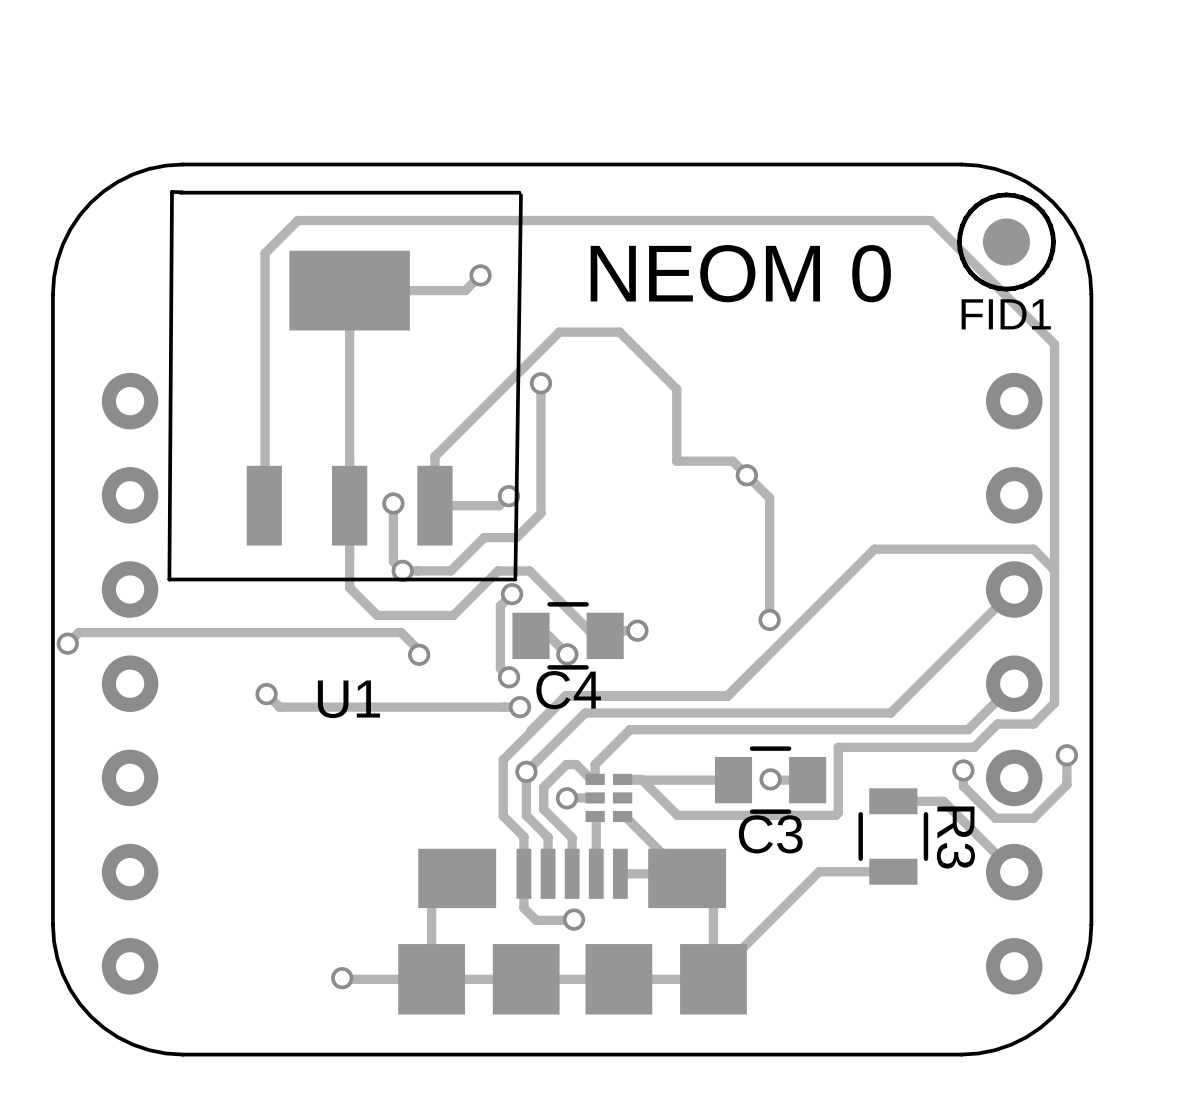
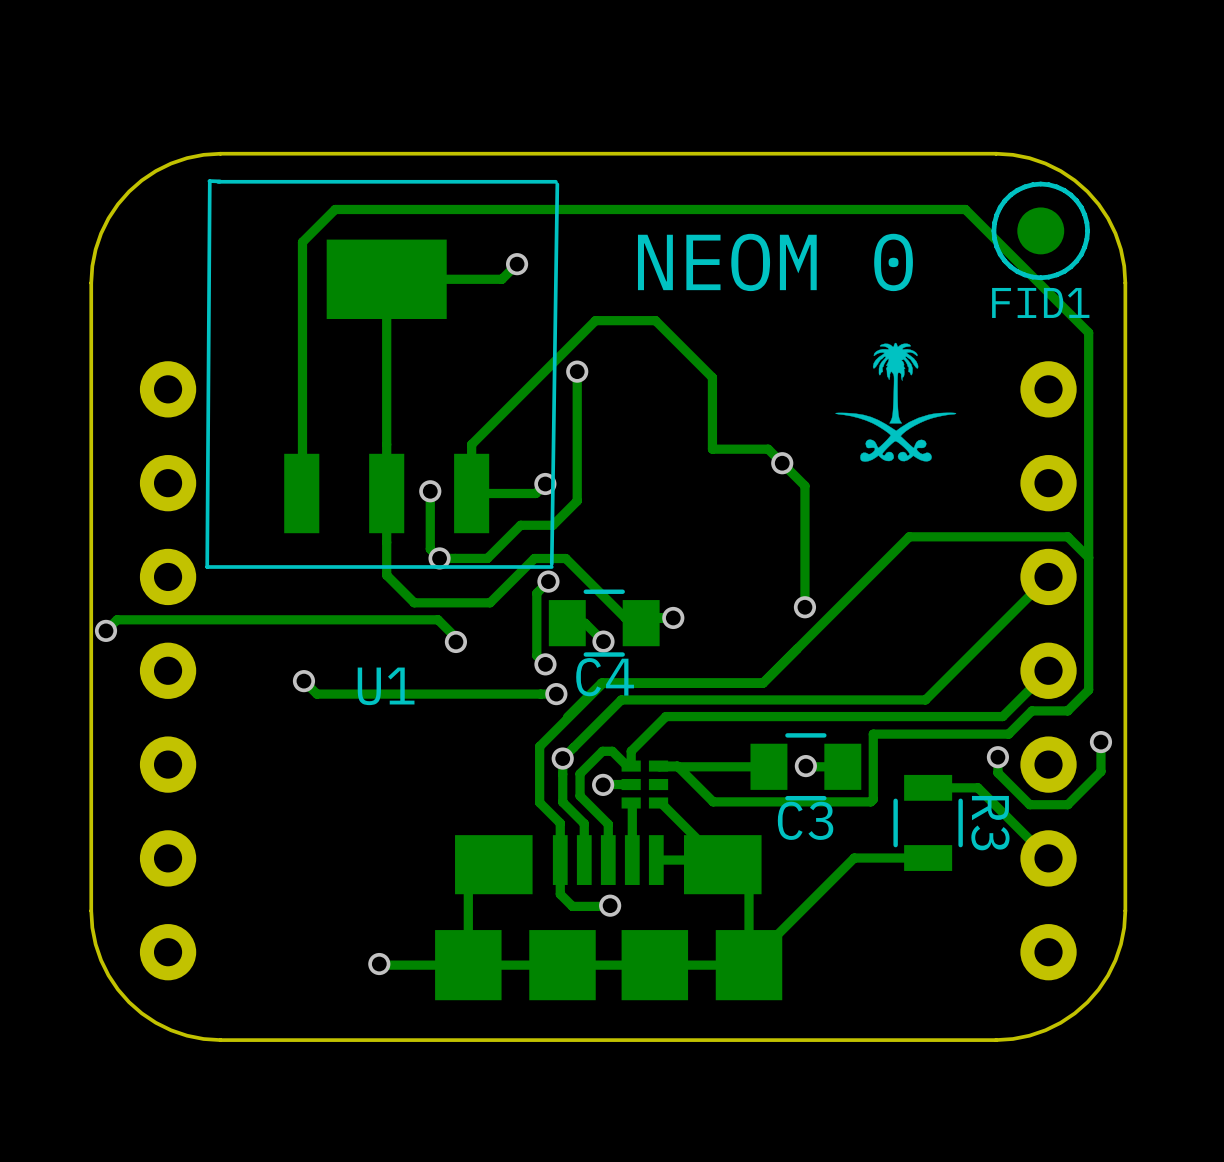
drawing: none -> [835, 342, 957, 462]

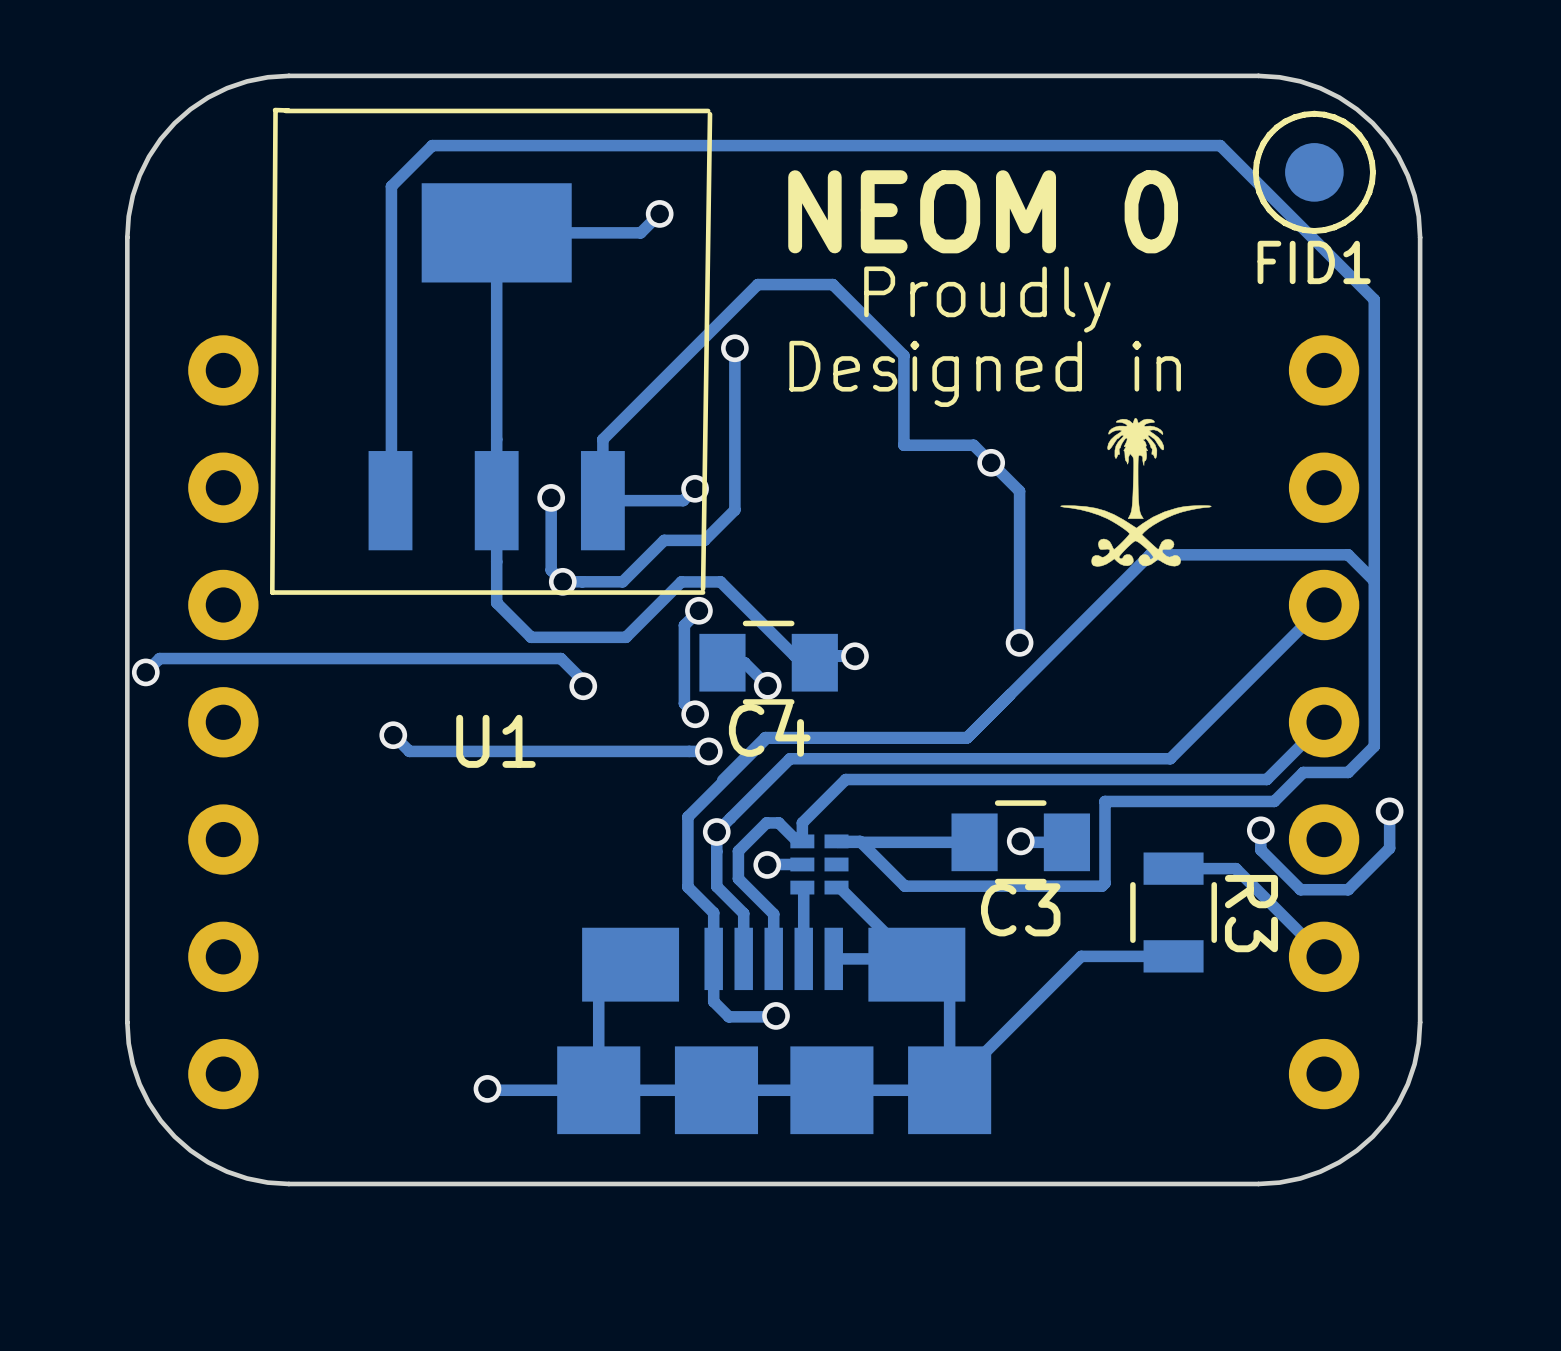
text: none -> Proudly (987, 299)
text: none -> Designed in (985, 373)
drawing position: (895, 402) -> (1135, 492)

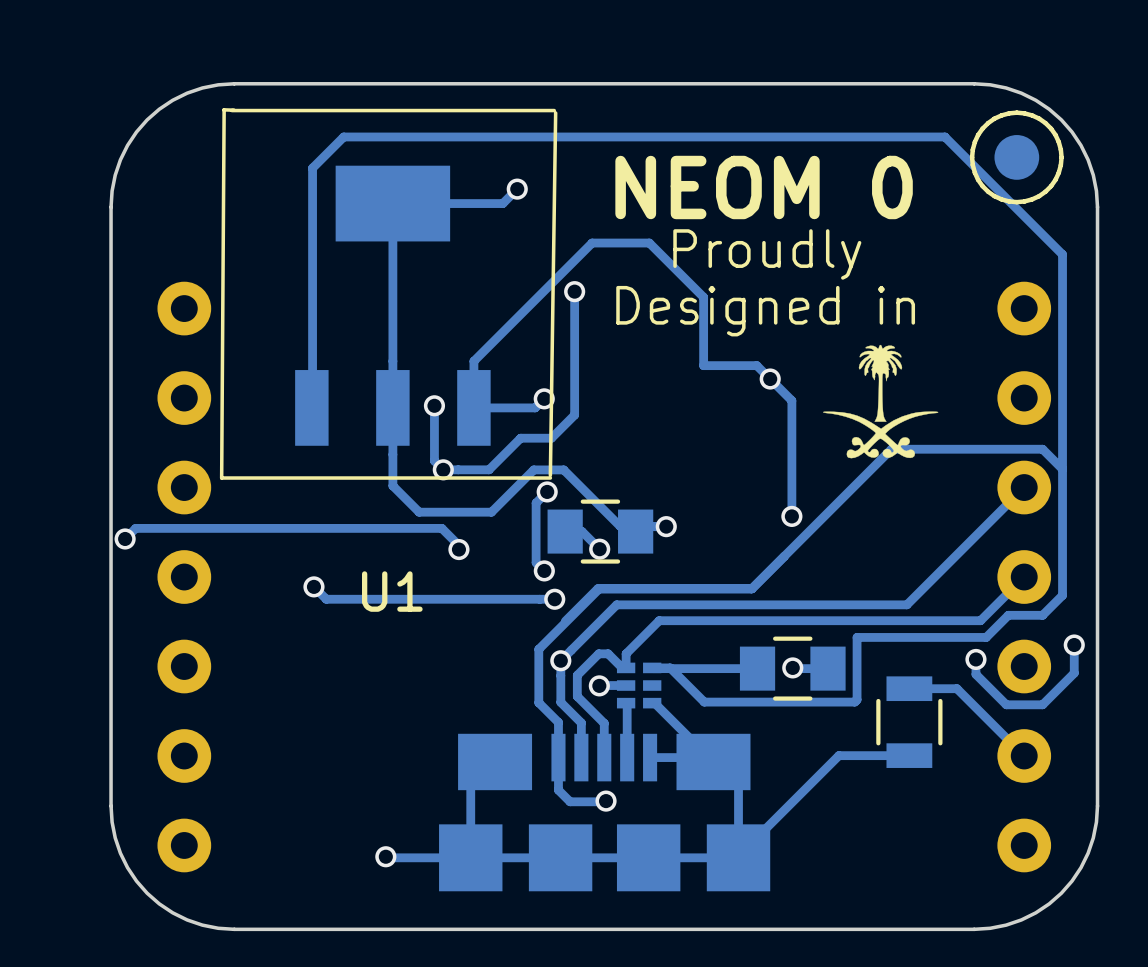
FID1 name: FID1 (1314, 262) -> none
C4 name: C4 (769, 729) -> none
C3 name: C3 (1020, 909) -> none
R3 name: R3 (1251, 913) -> none

